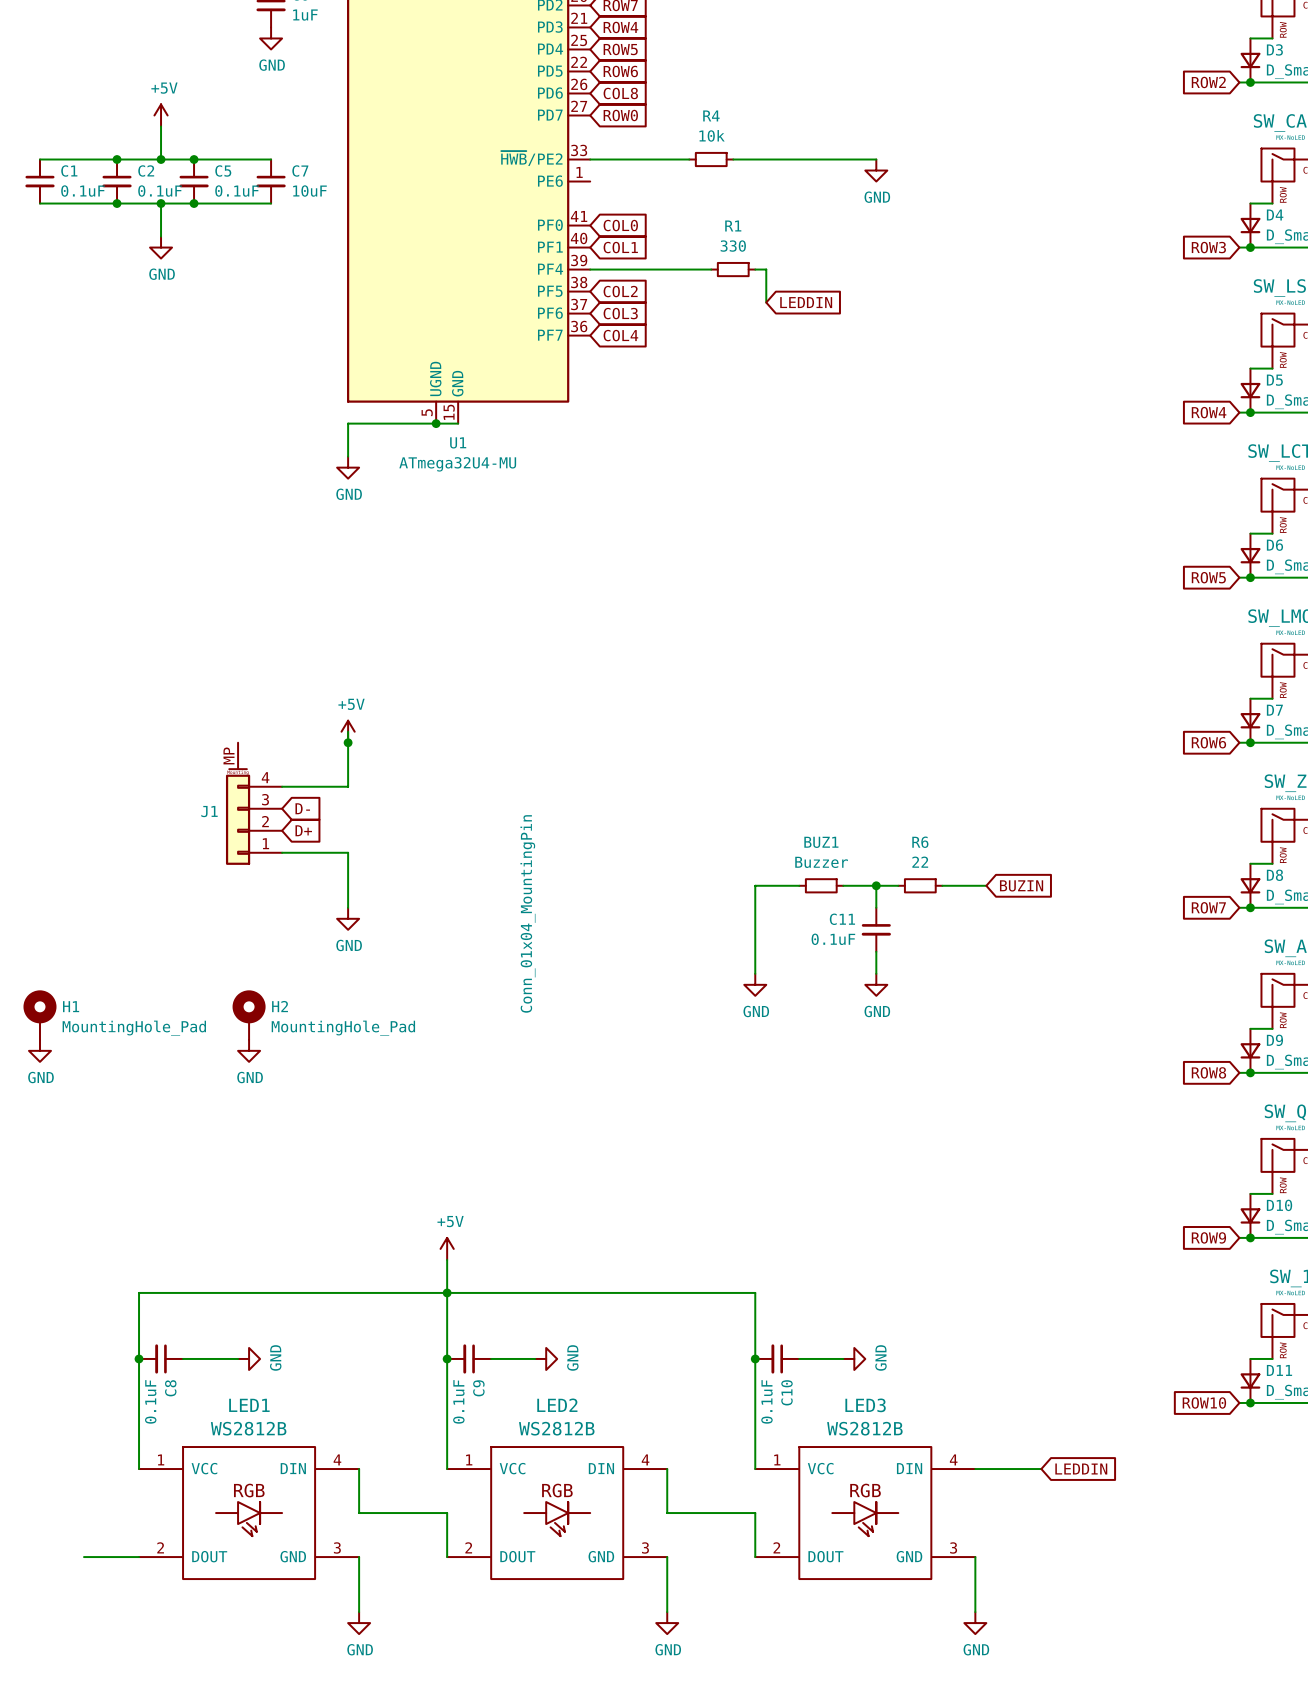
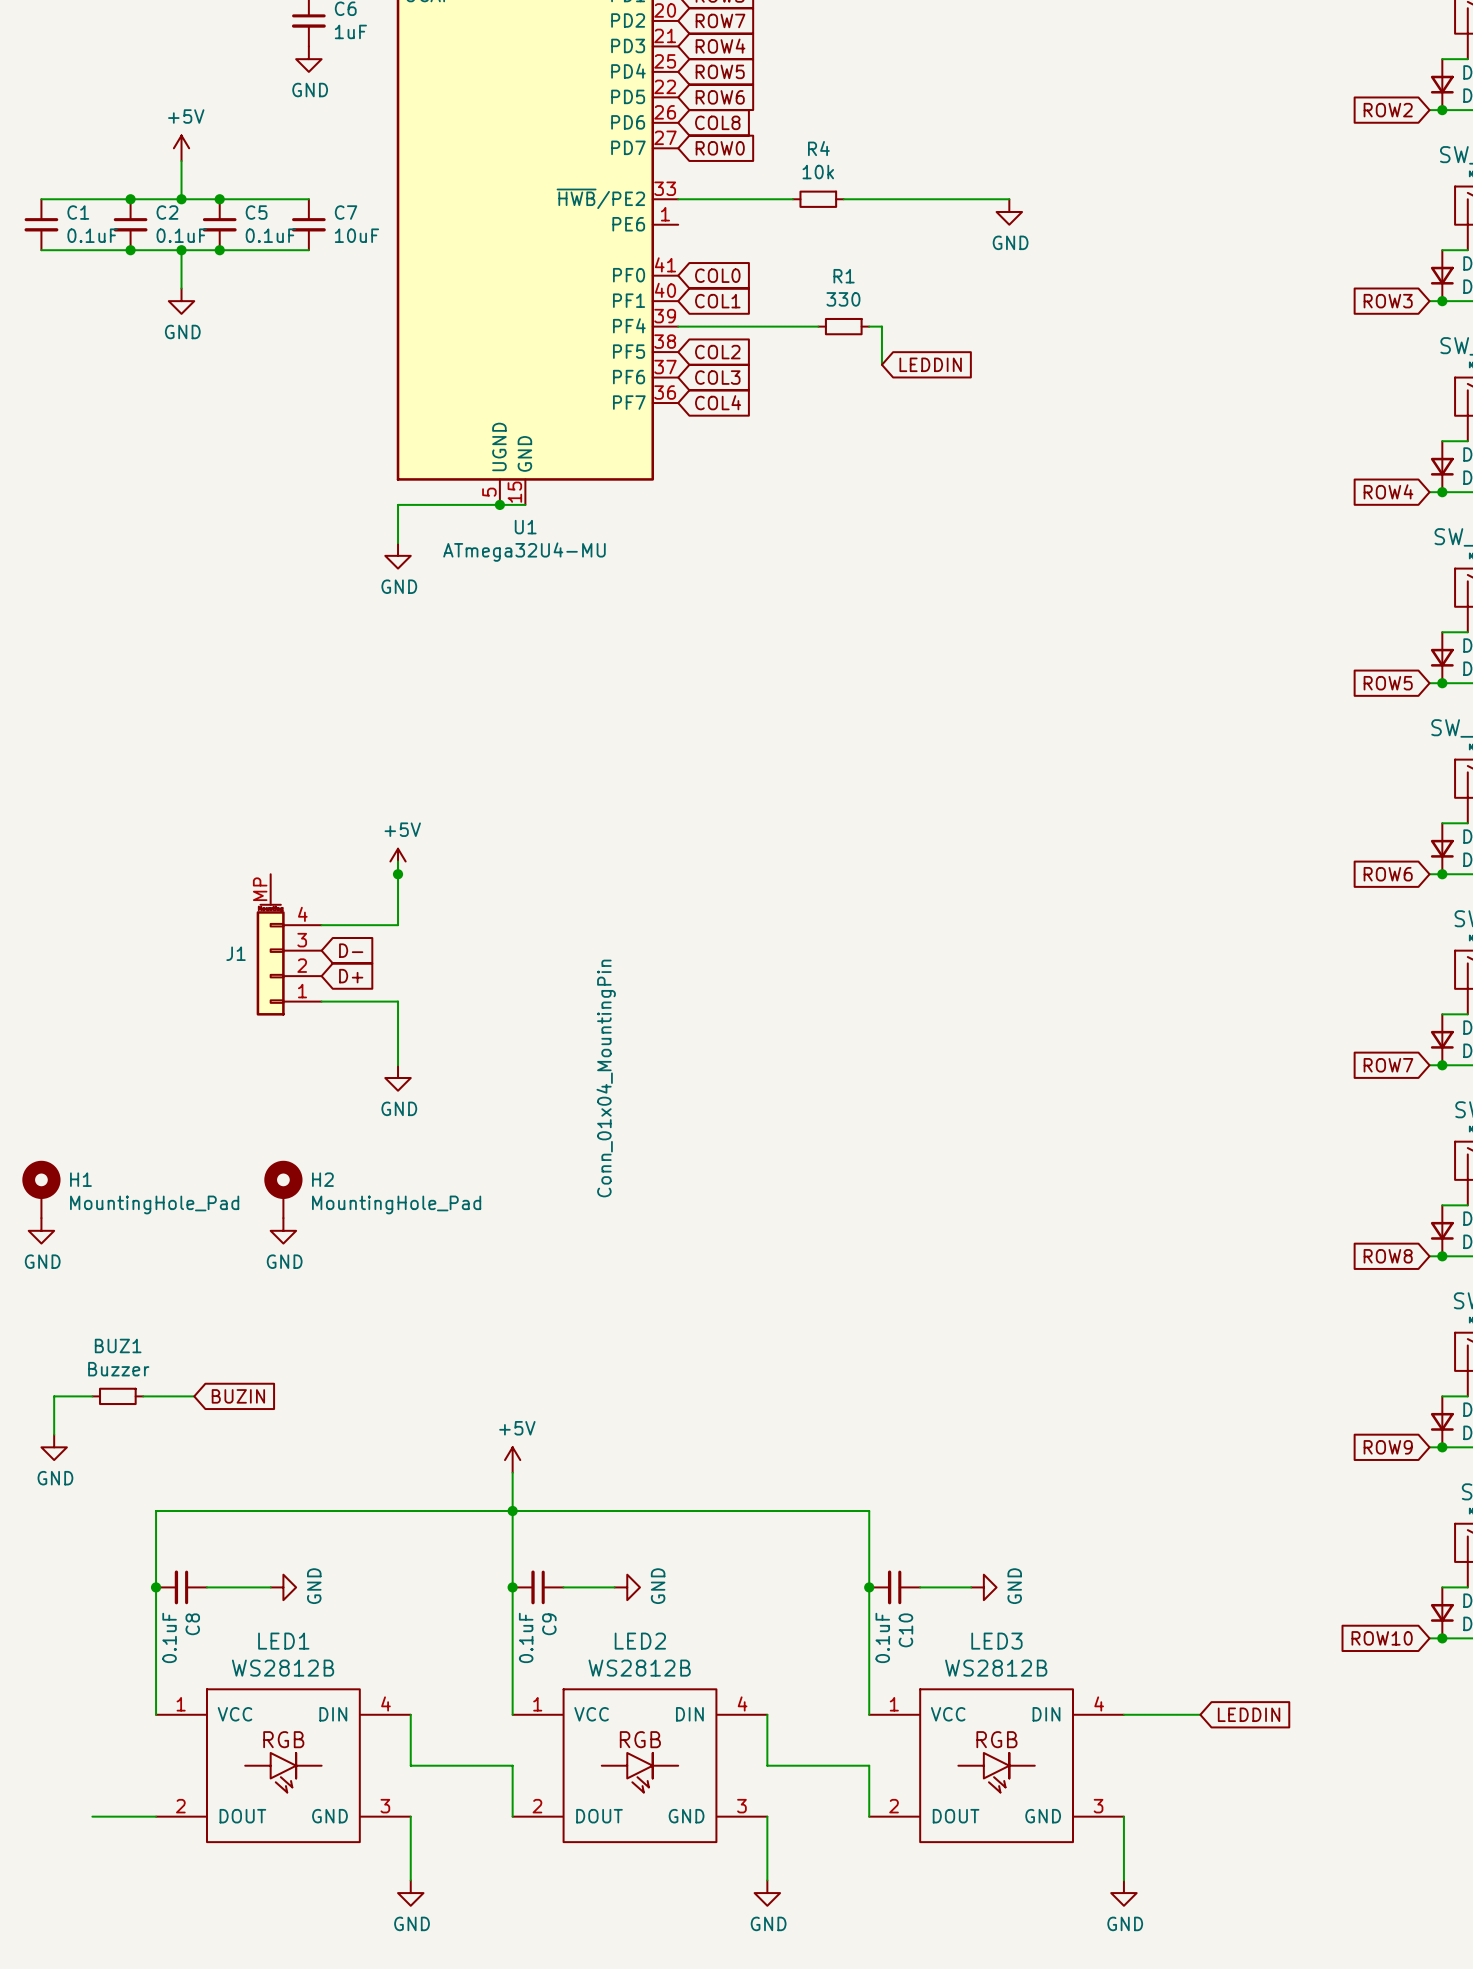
wire: (799, 885) (755, 885) (755, 973) -> none
BUZ1 position: (821, 885) -> (117, 1396)
wire: (843, 885) (898, 885) -> none
wire: (876, 885) (876, 907) -> none
junction: (876, 885) -> none
R6: 22 (920, 885) -> none
wire: (942, 885) (986, 885) -> none
global label: BUZIN (1021, 885) -> none
C11: 0.1uF (876, 929) -> none
wire: (876, 951) (876, 973) -> none
power symbol: GND (755, 984) -> none
power symbol: GND (876, 984) -> none
wire: none -> (92, 1396) (54, 1396) (54, 1434)
wire: none -> (143, 1396) (194, 1396)
global label: none -> BUZIN (238, 1396)
power symbol: none -> GND (54, 1447)

